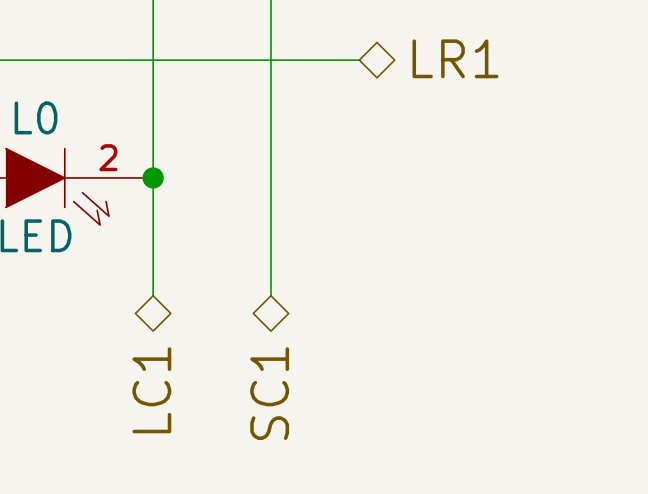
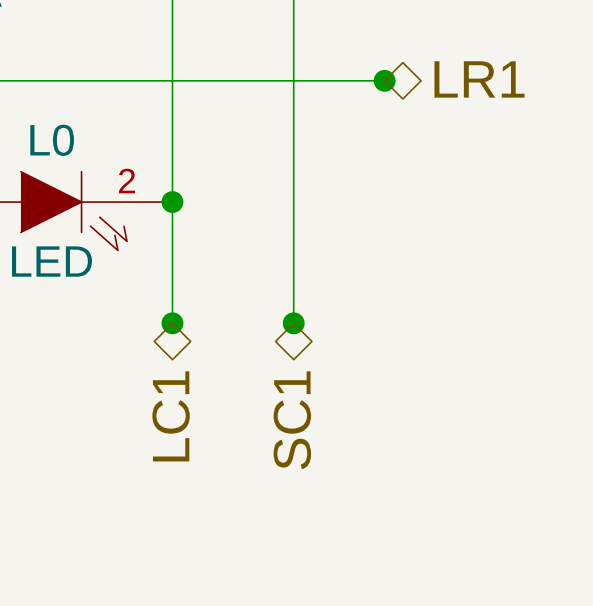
junction: none -> (384, 80)
junction: none -> (172, 323)
junction: none -> (293, 323)

